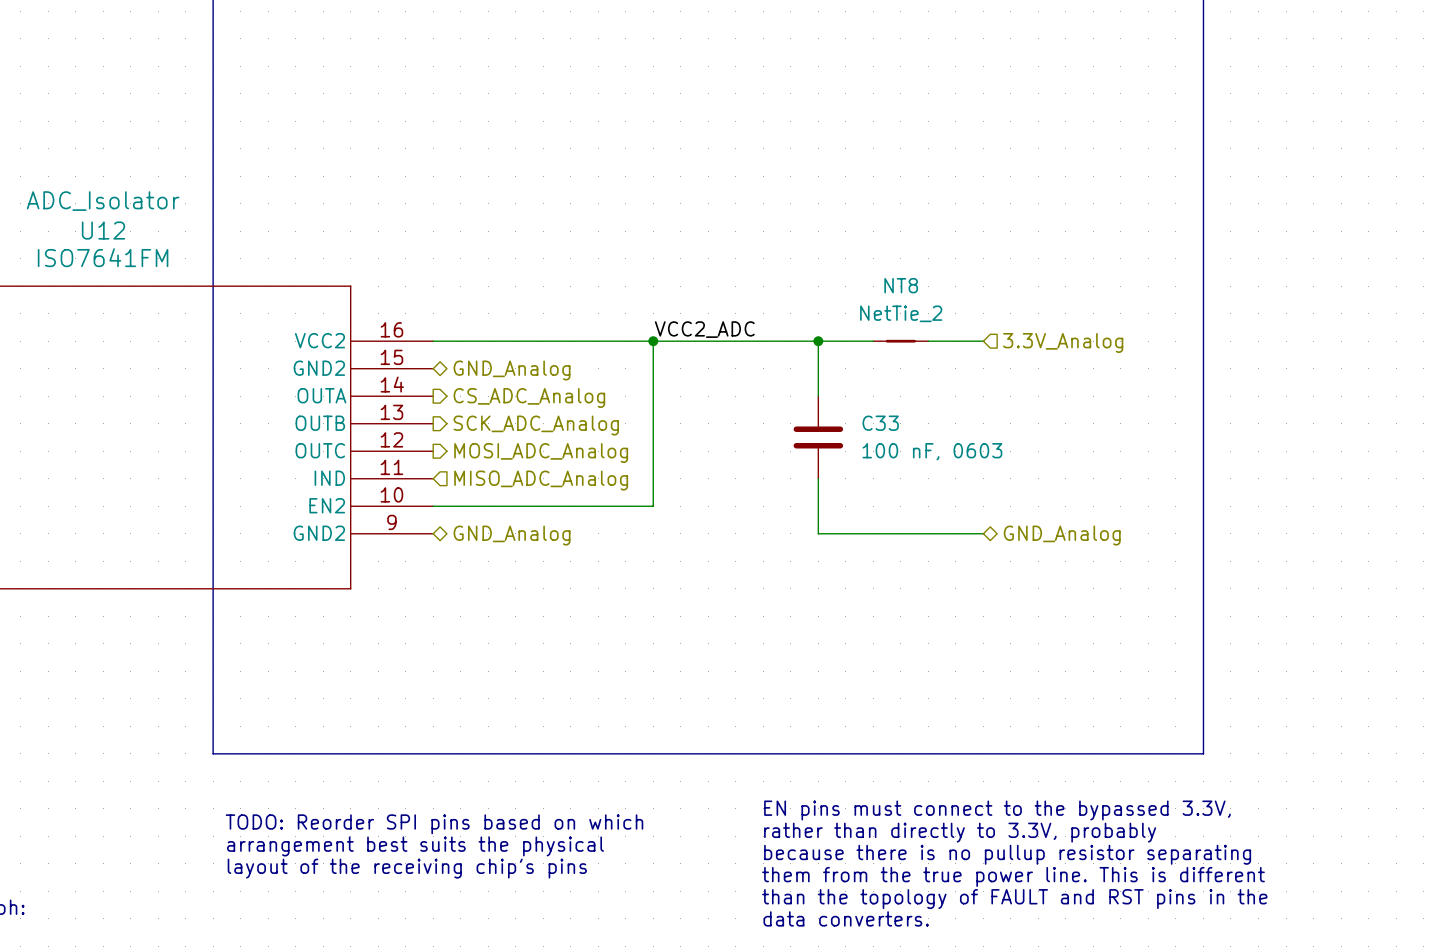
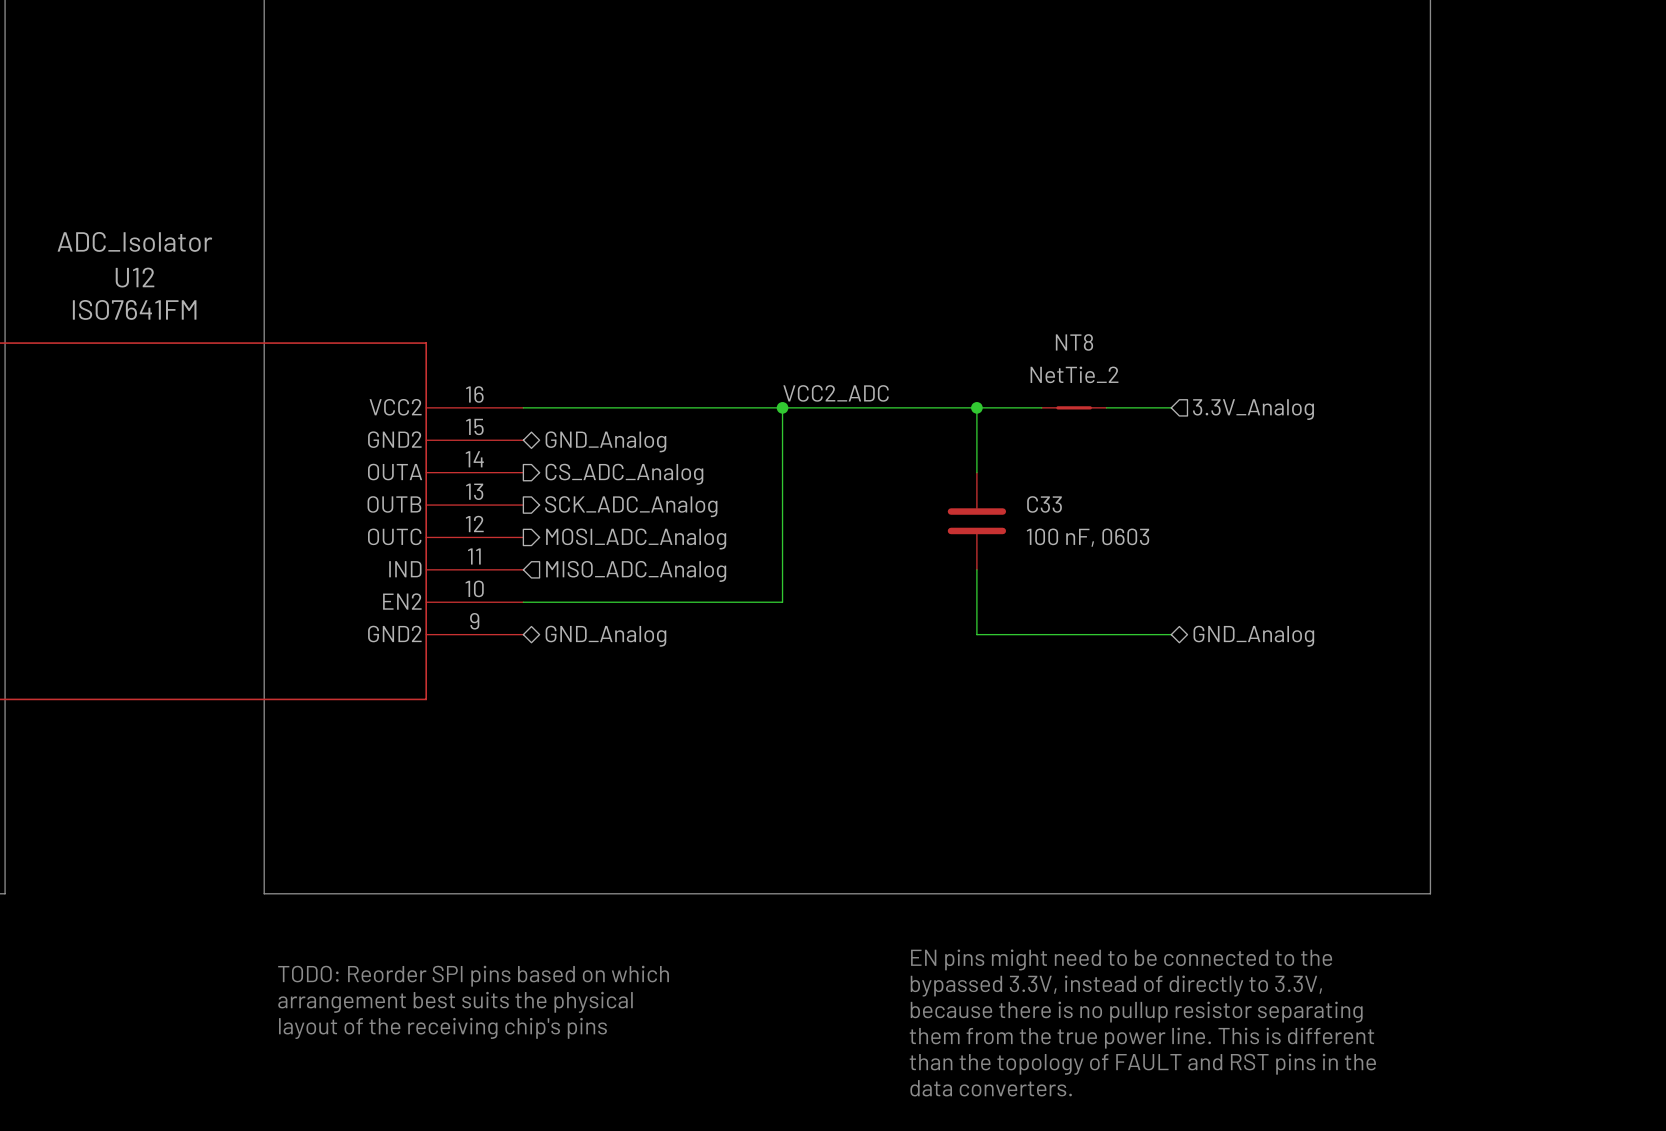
text: EN pins must connect to the bypassed 3.3V, (997, 810) -> EN pins might need to be connected to the (1121, 959)
text: rather than directly to 3.3V, probably (960, 832) -> bypassed 3.3V, instead of directly to 3.3V, (1116, 986)

